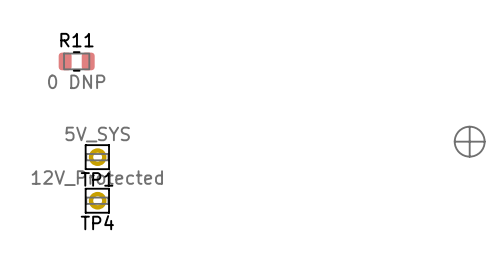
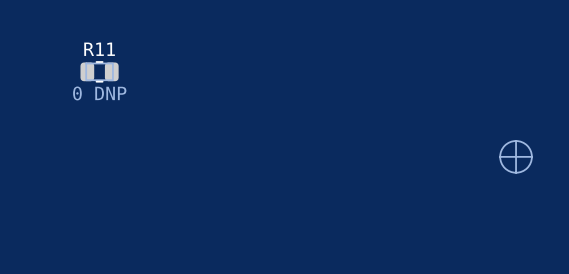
TP1: 5V_SYS (97, 157) -> none
TP4: 12V_Protected (97, 200) -> none

